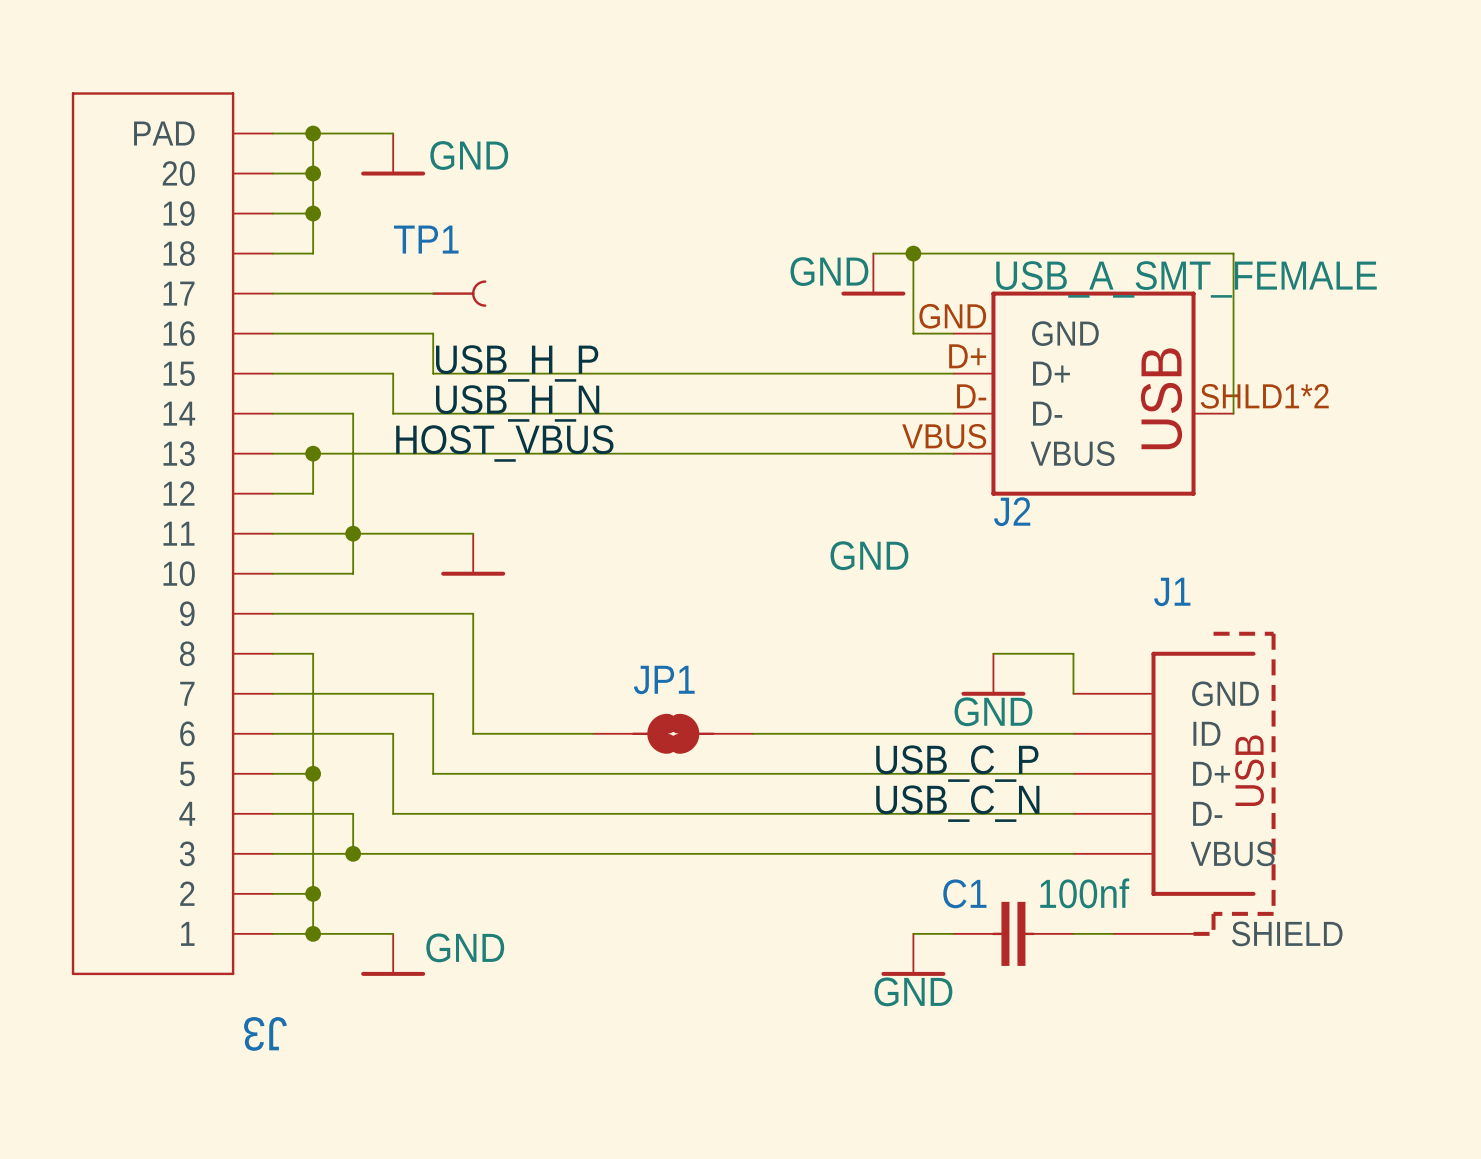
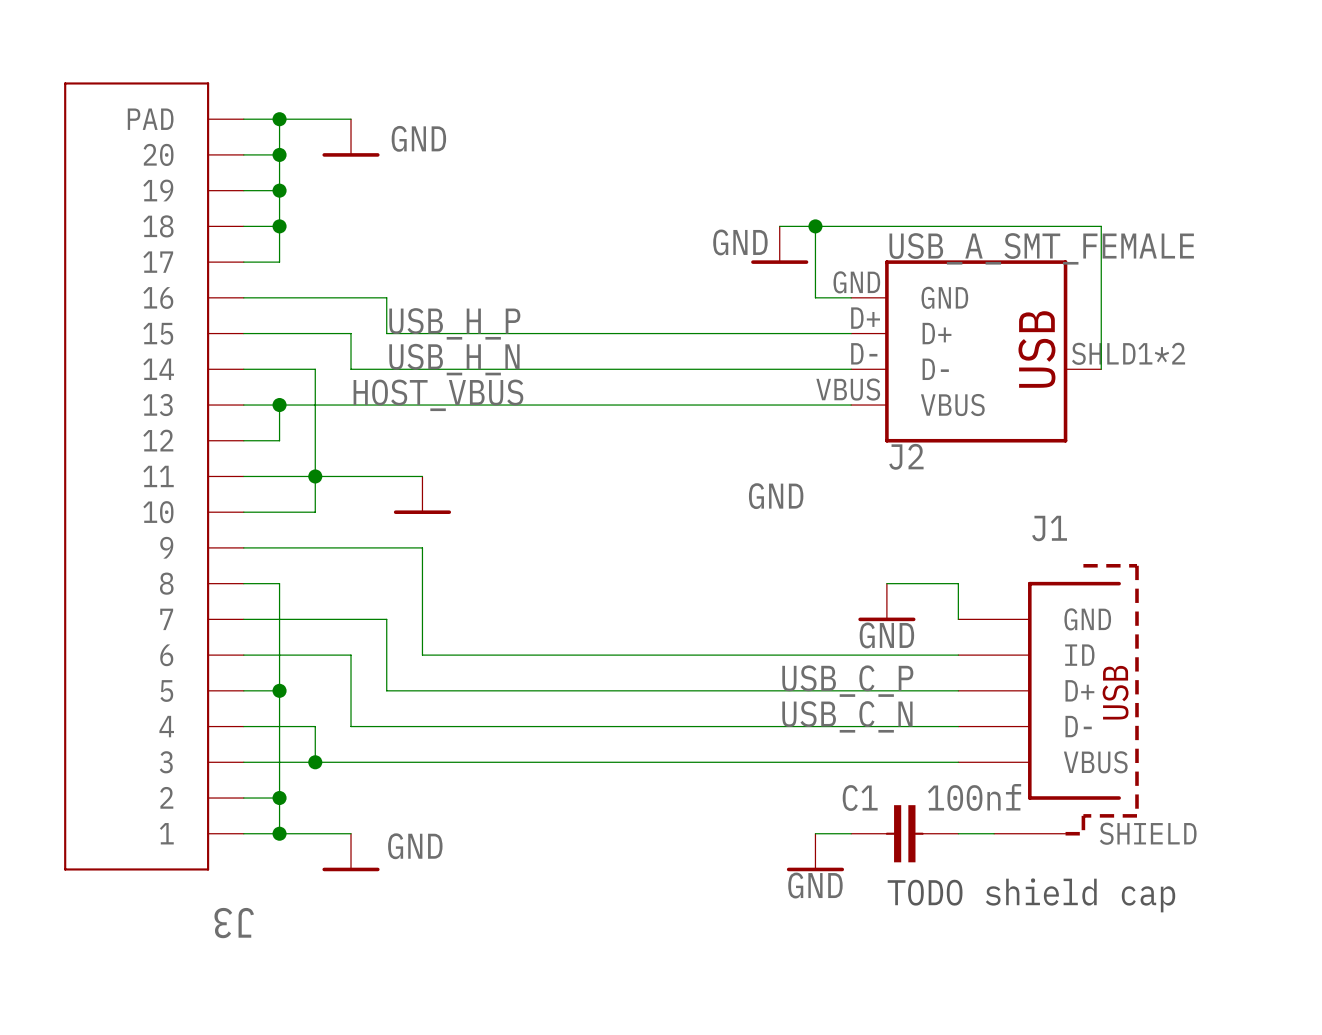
junction: none -> (279, 226)
wire: (313, 293) (433, 293) -> (279, 262) (279, 226)
TP1: (459, 293) -> none
JP1: (673, 733) -> none
text: none -> TODO shield cap (1031, 895)

